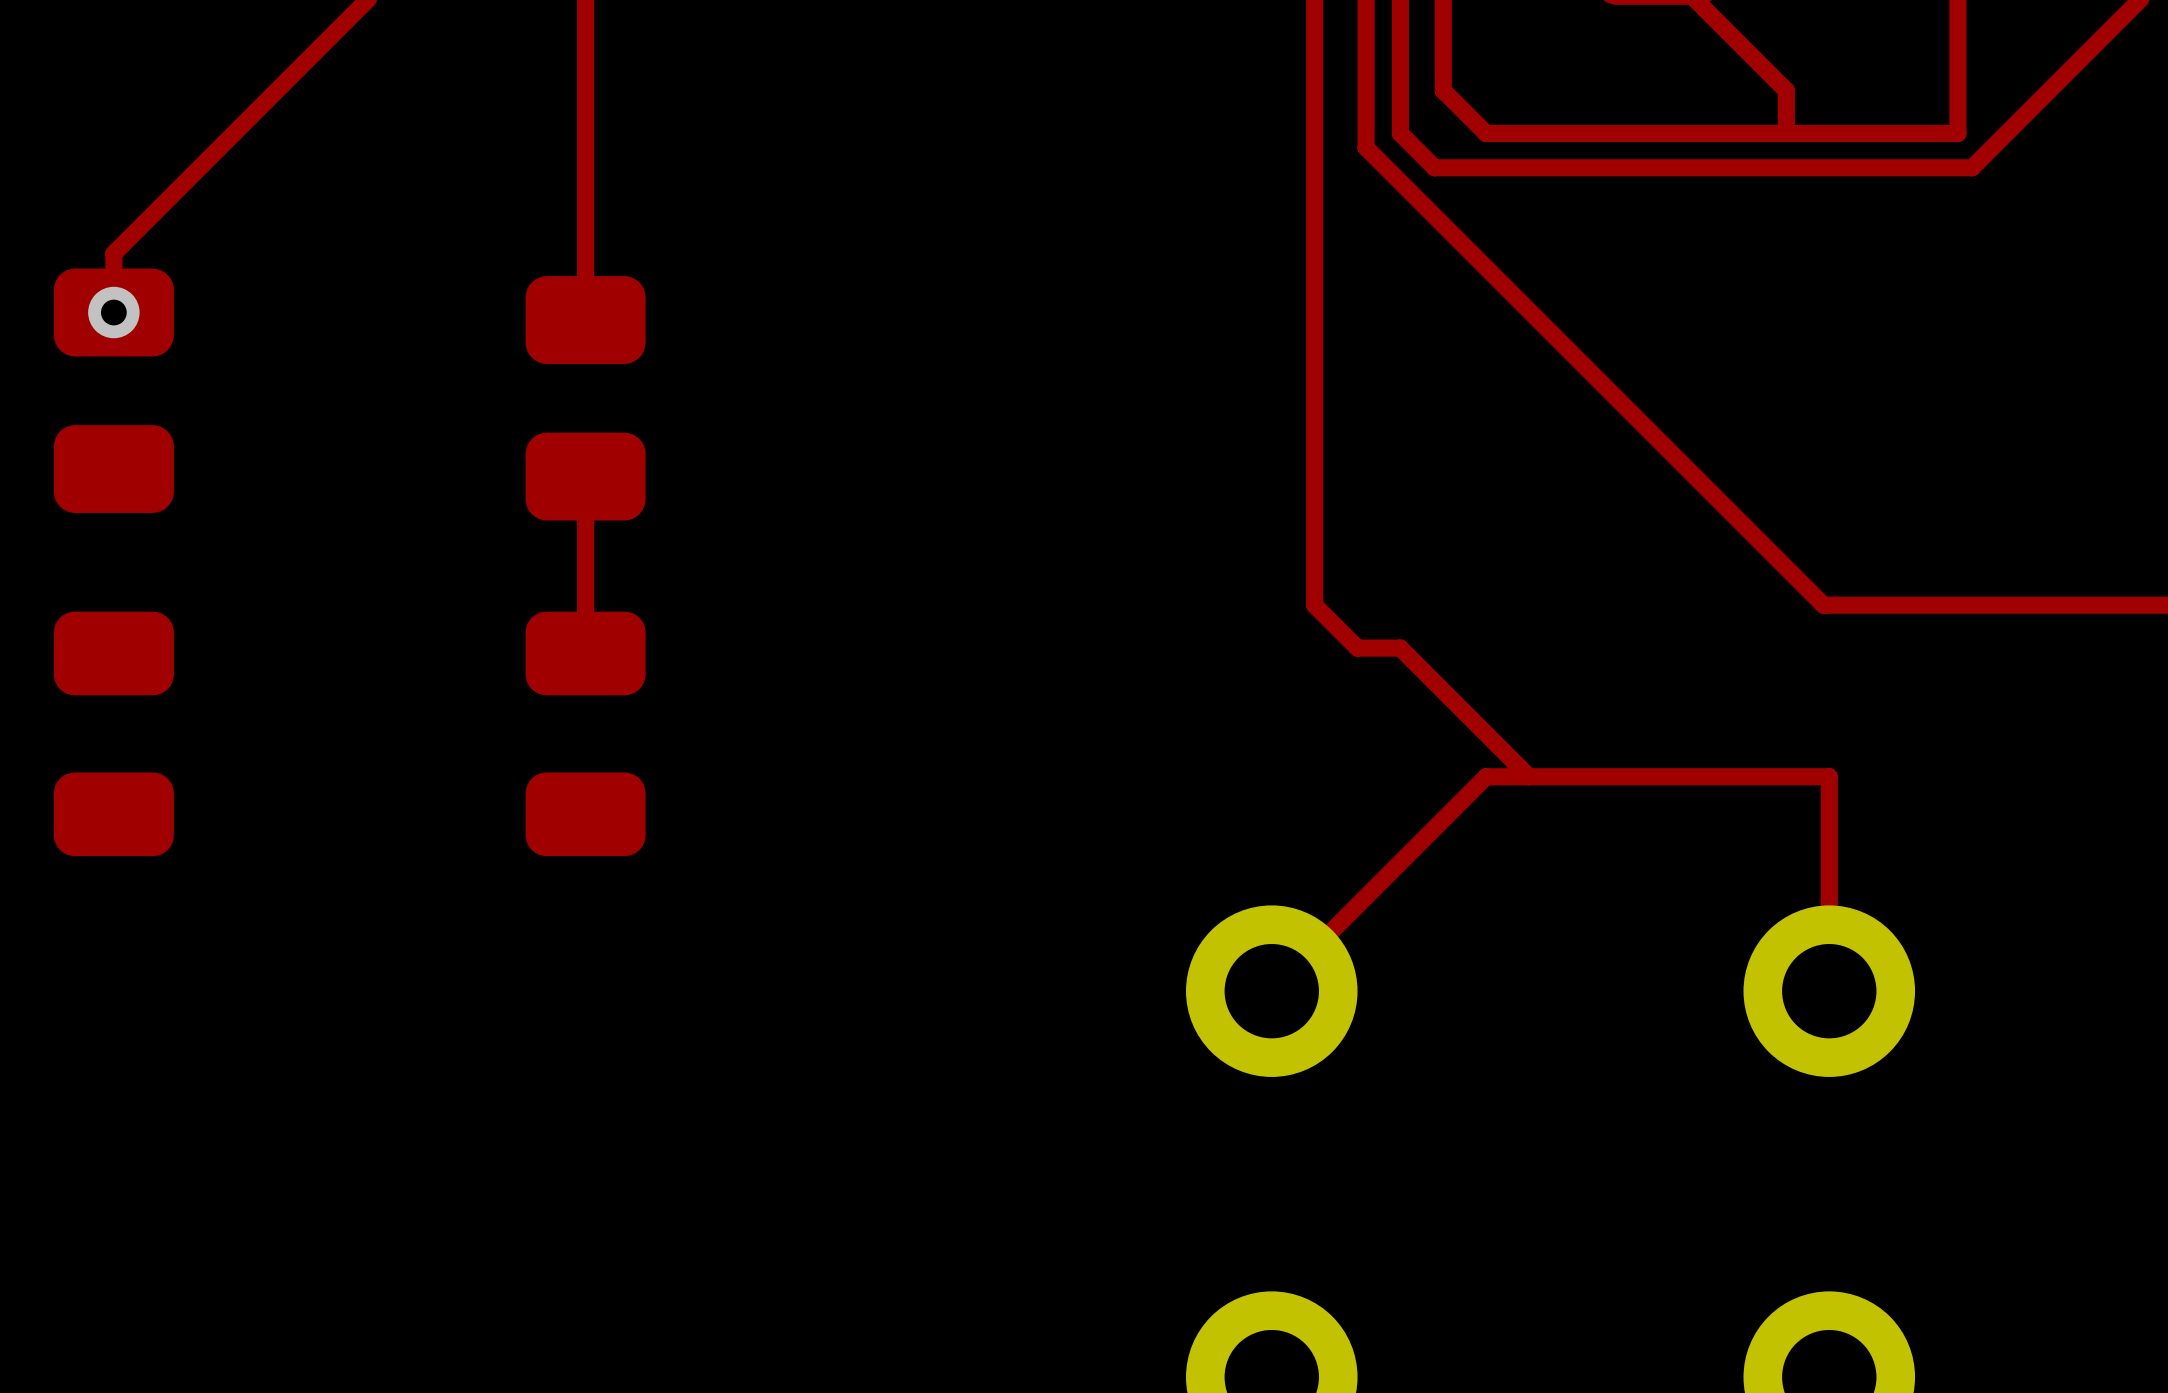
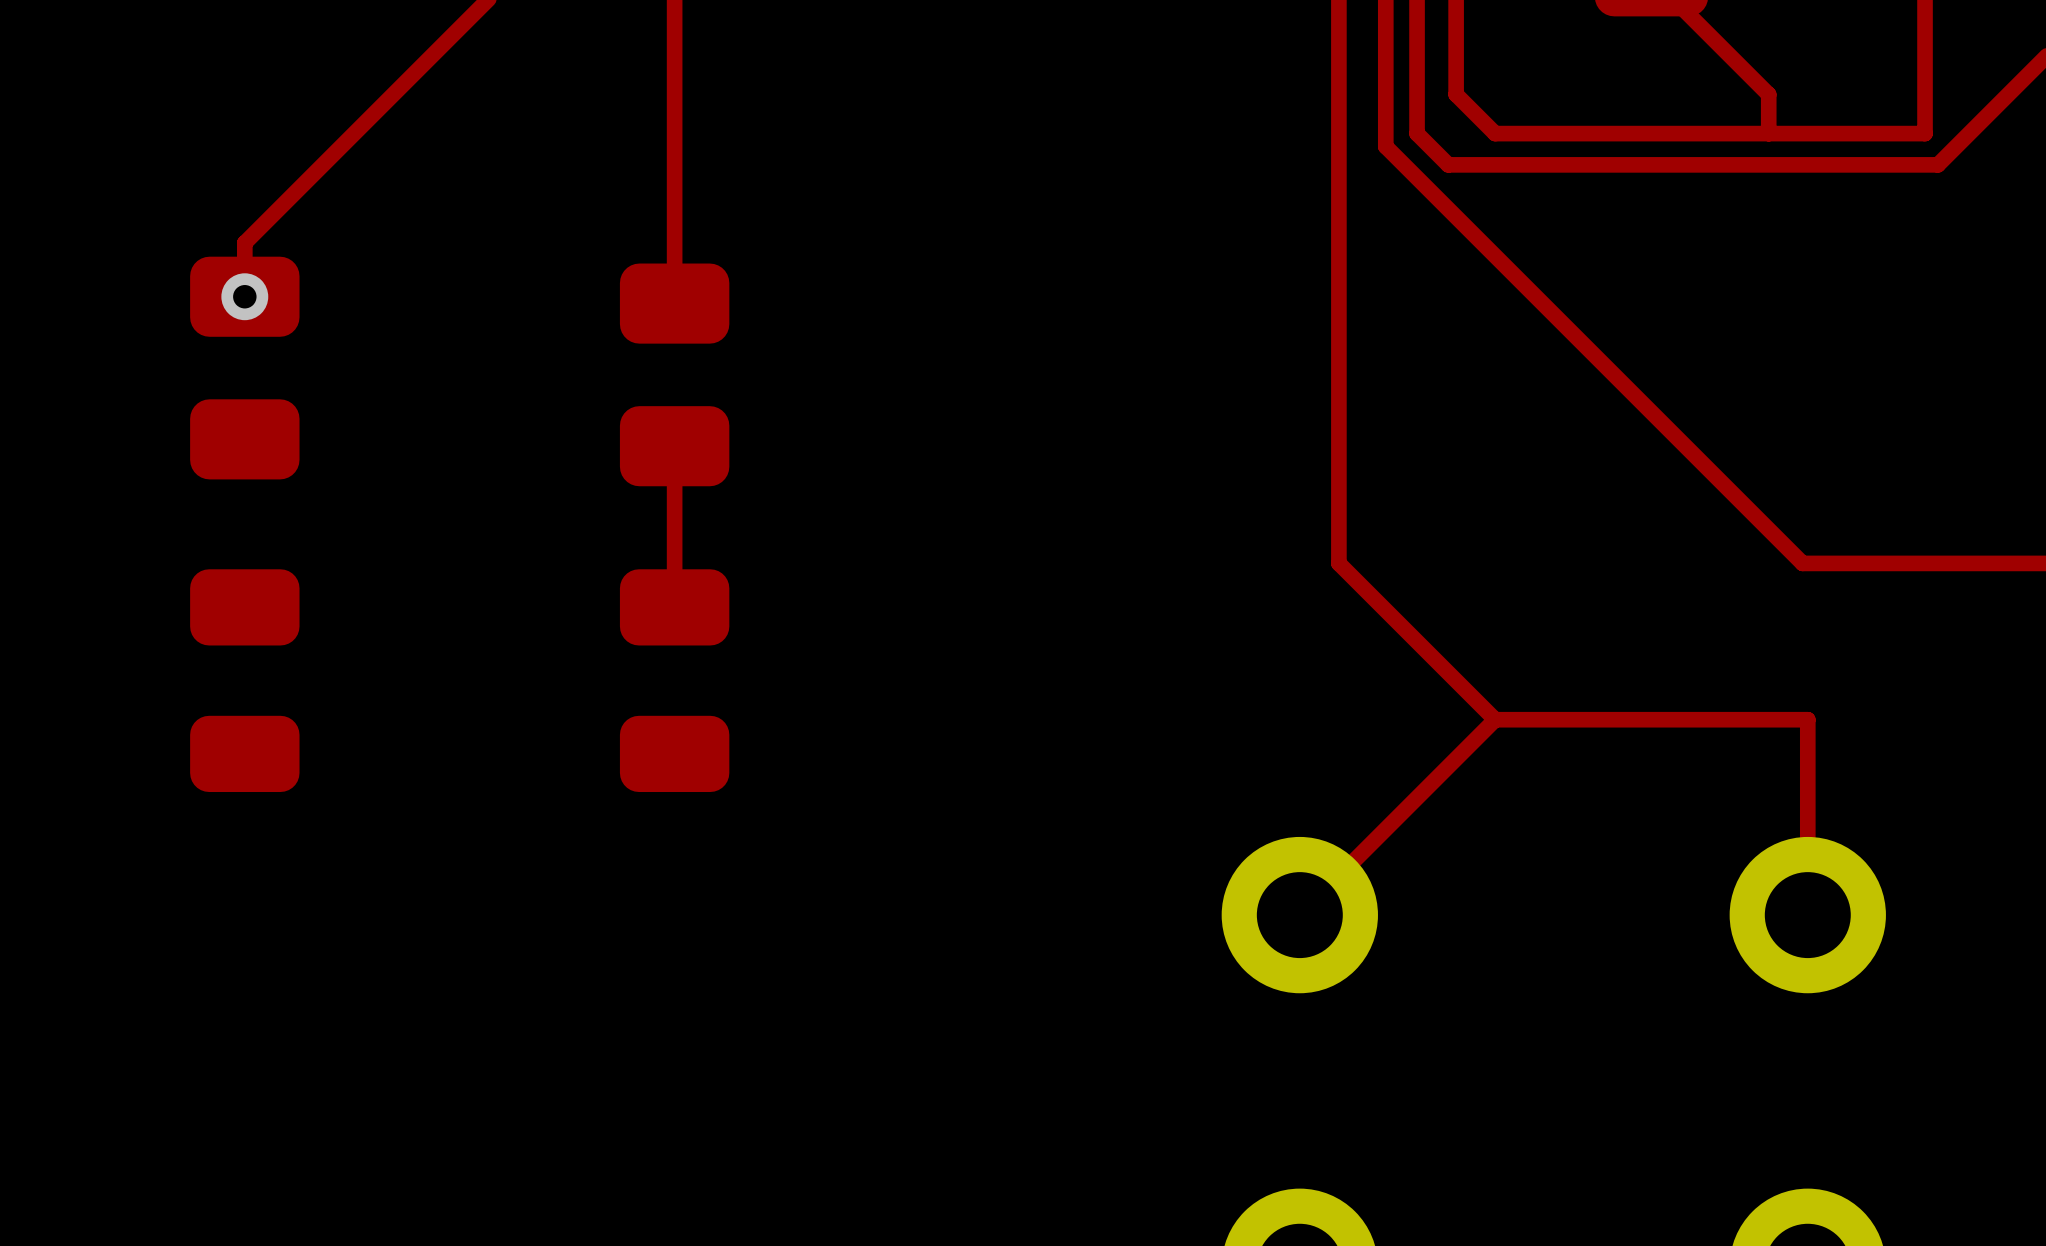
top track: (1357, 648) (1400, 648) (1529, 776) -> (1377, 602) (1495, 719)

